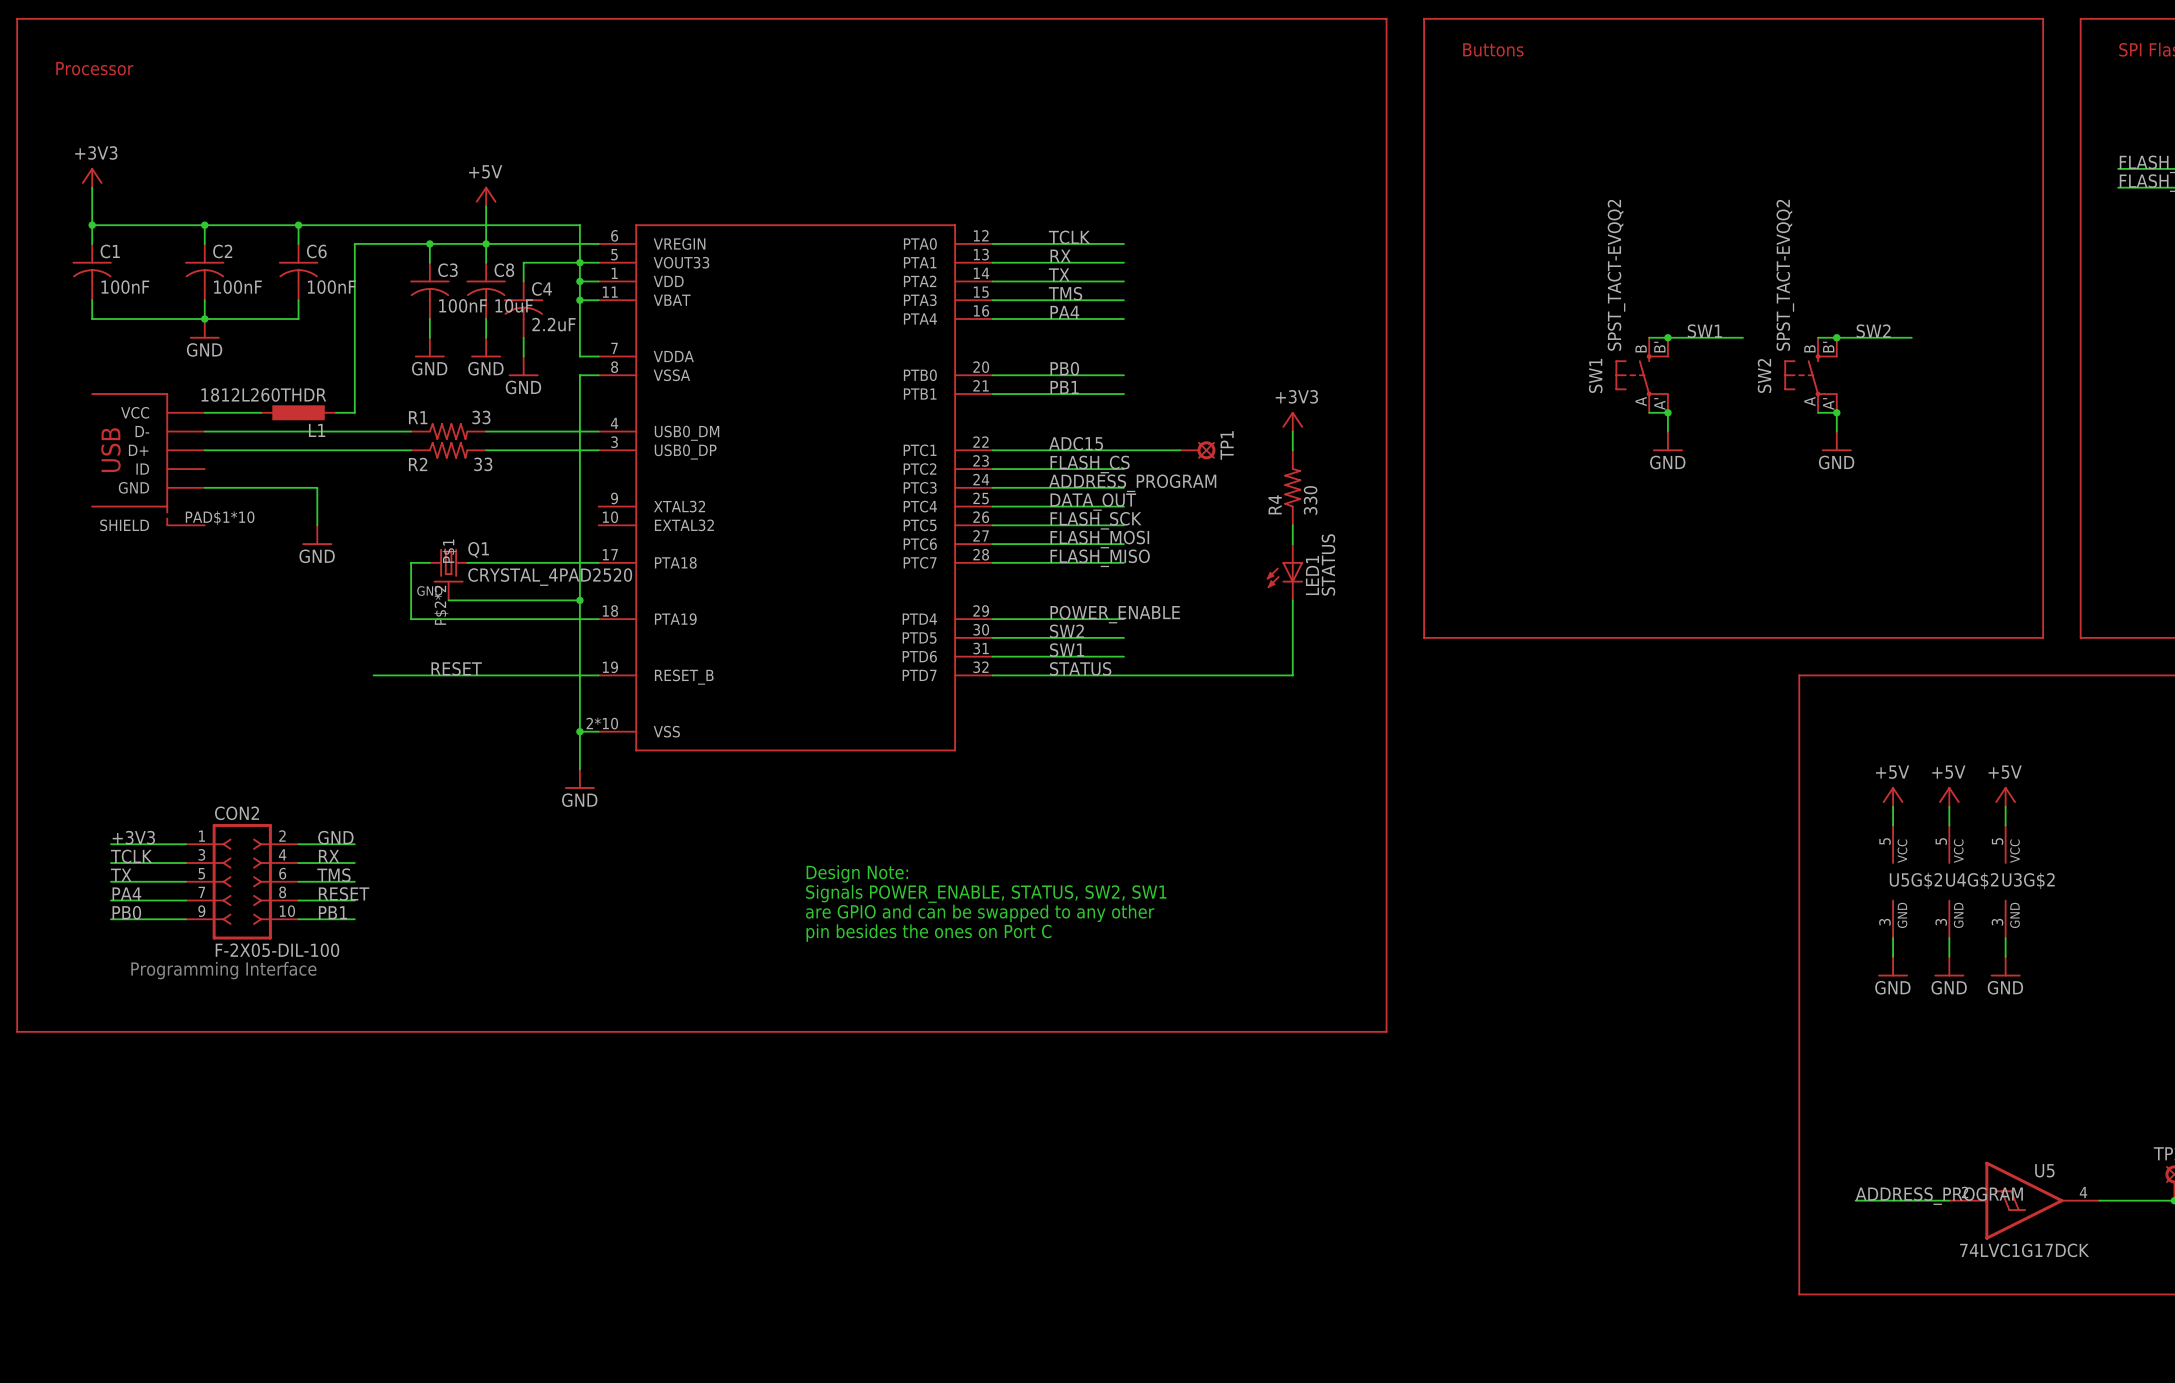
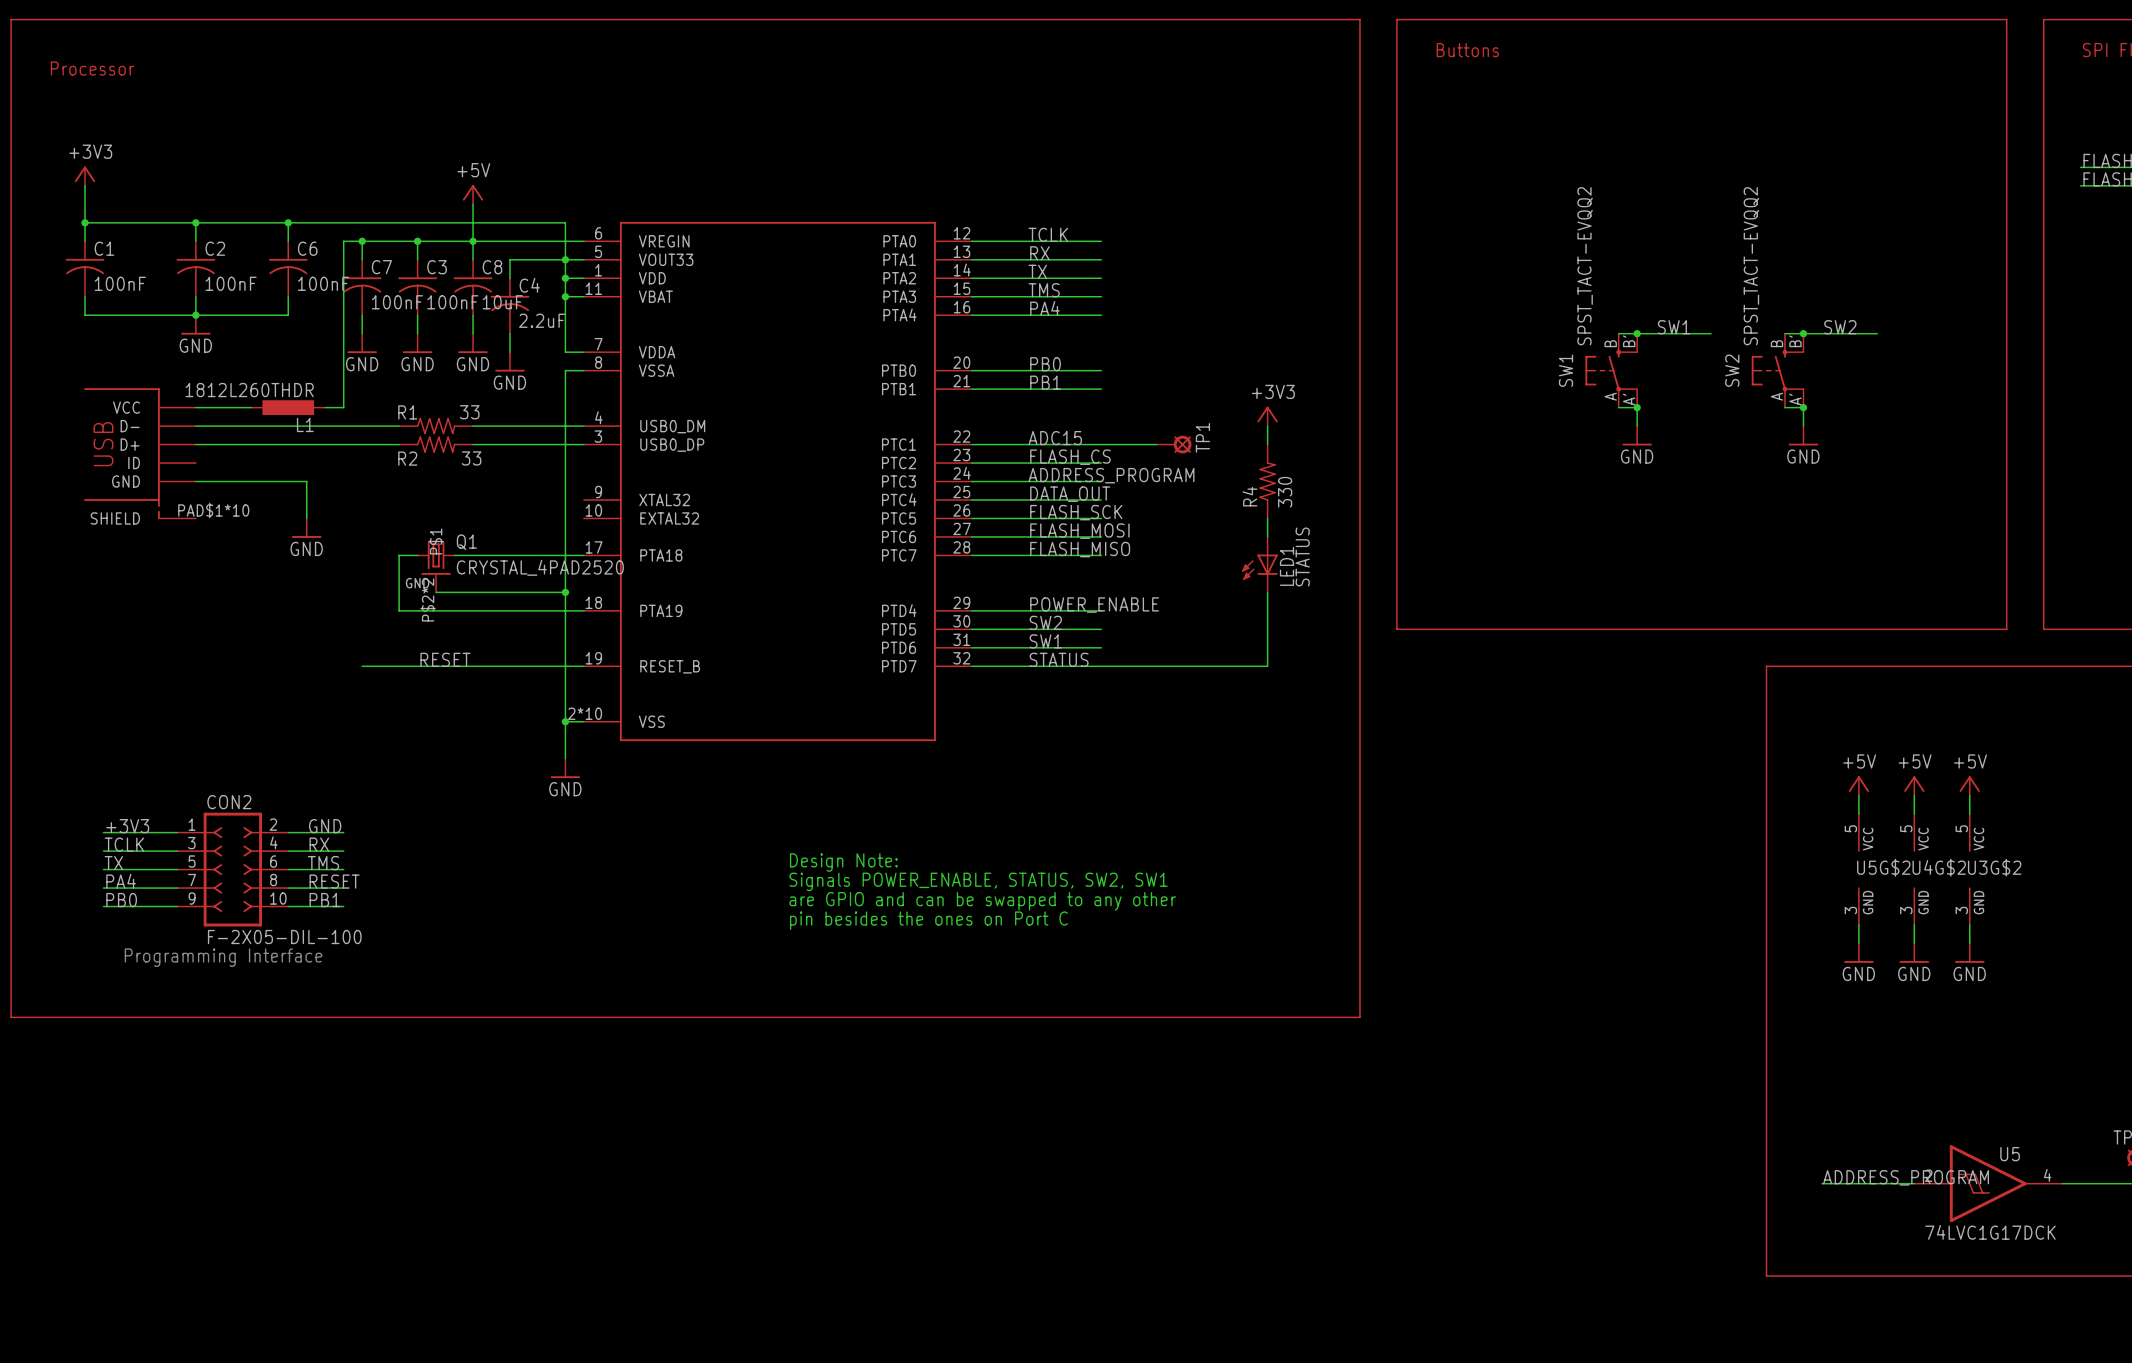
wire: none -> (362, 241) (362, 259)
junction: none -> (362, 241)
C7: none -> 100nF (362, 287)
wire: none -> (362, 315) (362, 333)
power symbol: none -> GND (362, 343)

